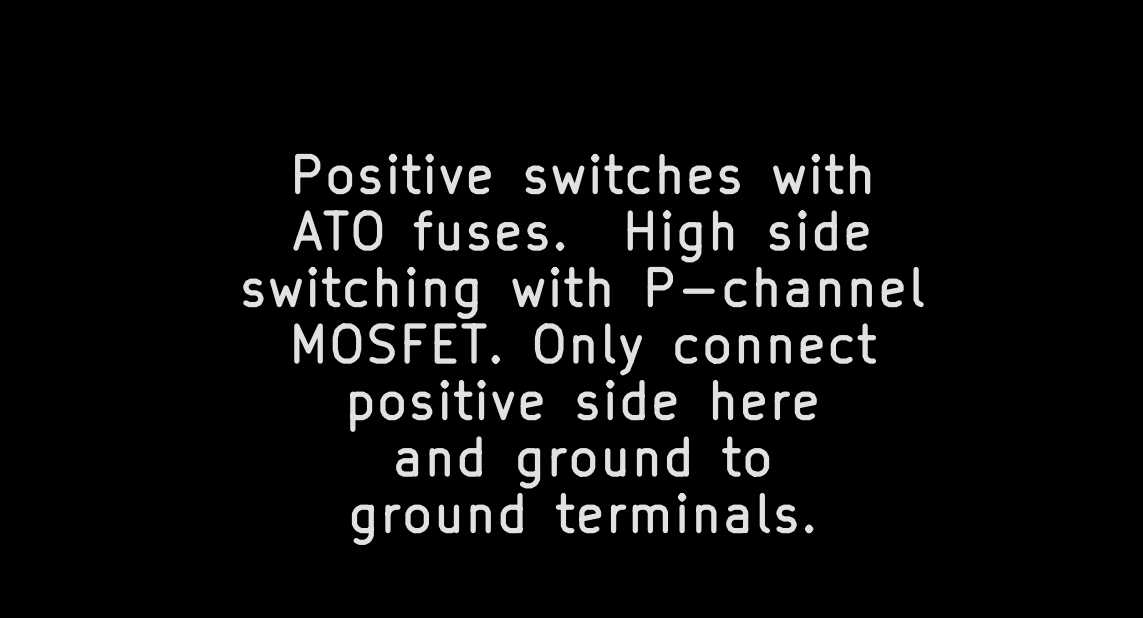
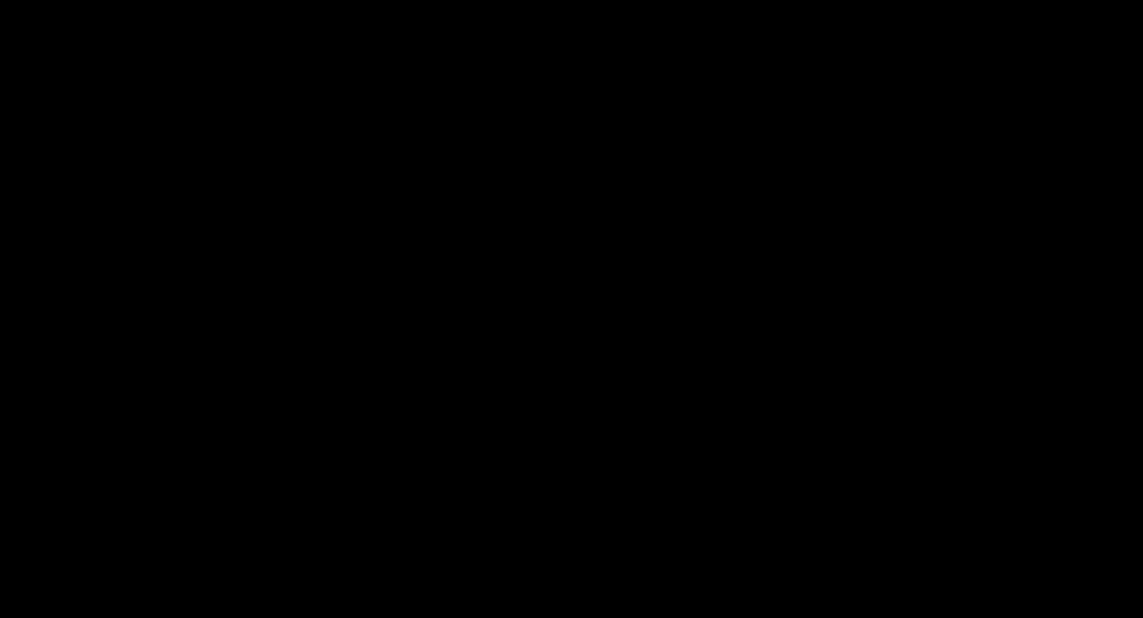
text: Positive switches with (582, 174) -> none
text: ATO fuses. High side (580, 236) -> none
text: switching with P-channel (583, 292) -> none
text: MOSFET. Only connect (585, 349) -> none
text: positive side here (583, 405) -> none
text: and ground to (582, 462) -> none
text: ground terminals. (582, 518) -> none

